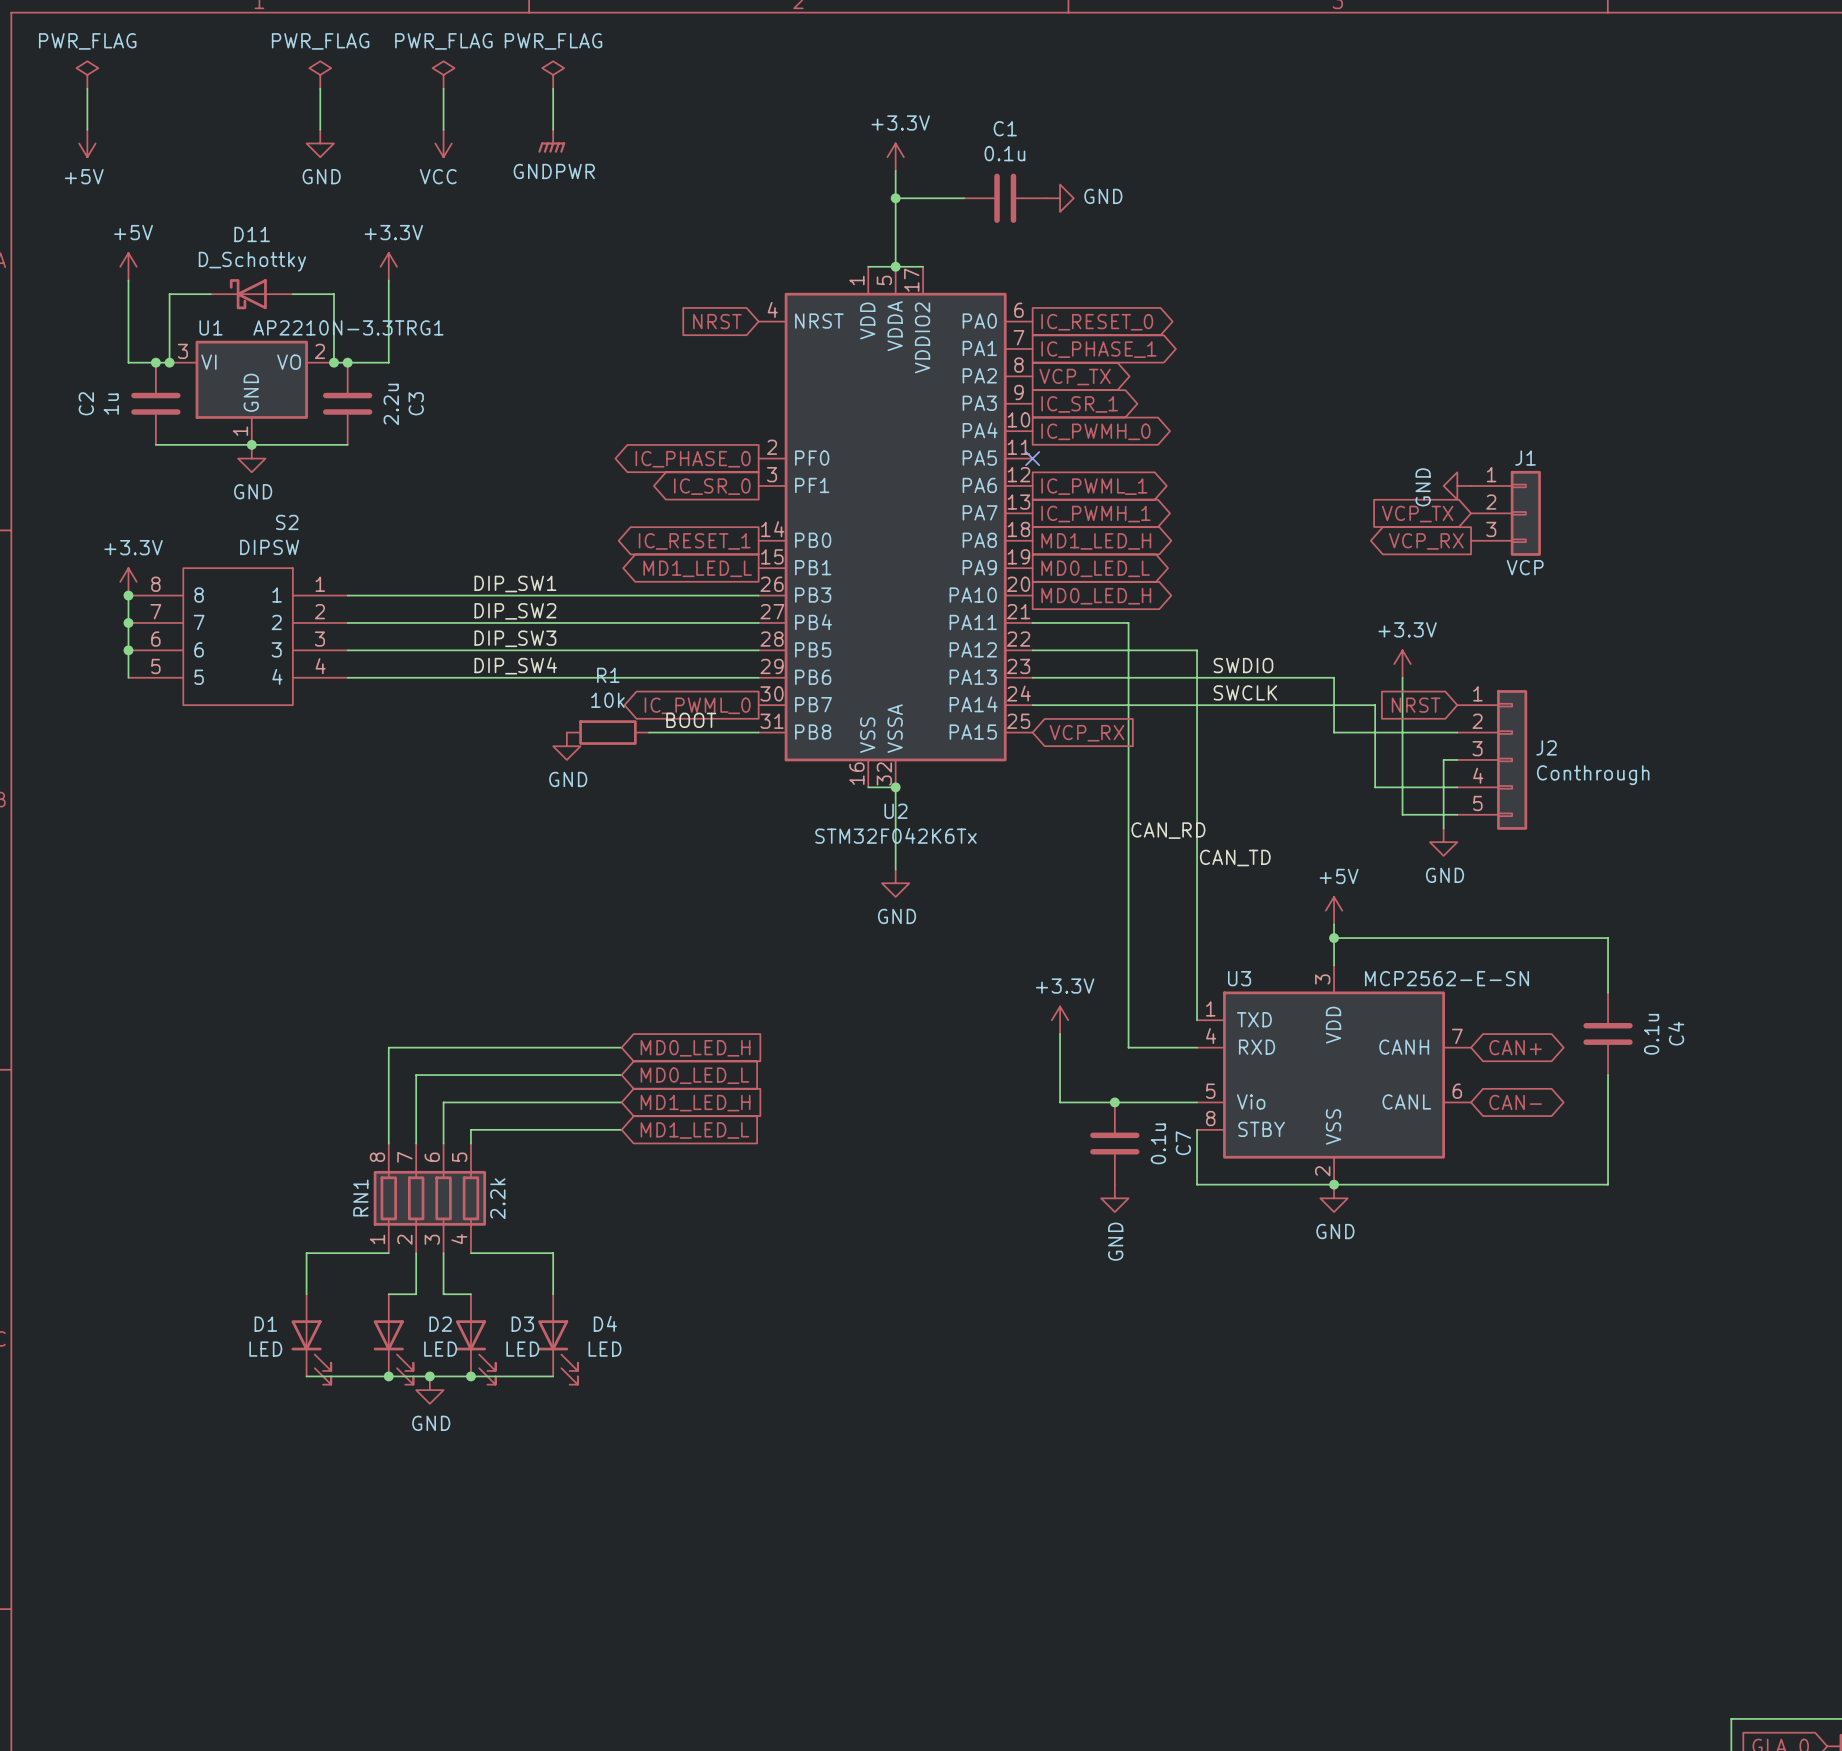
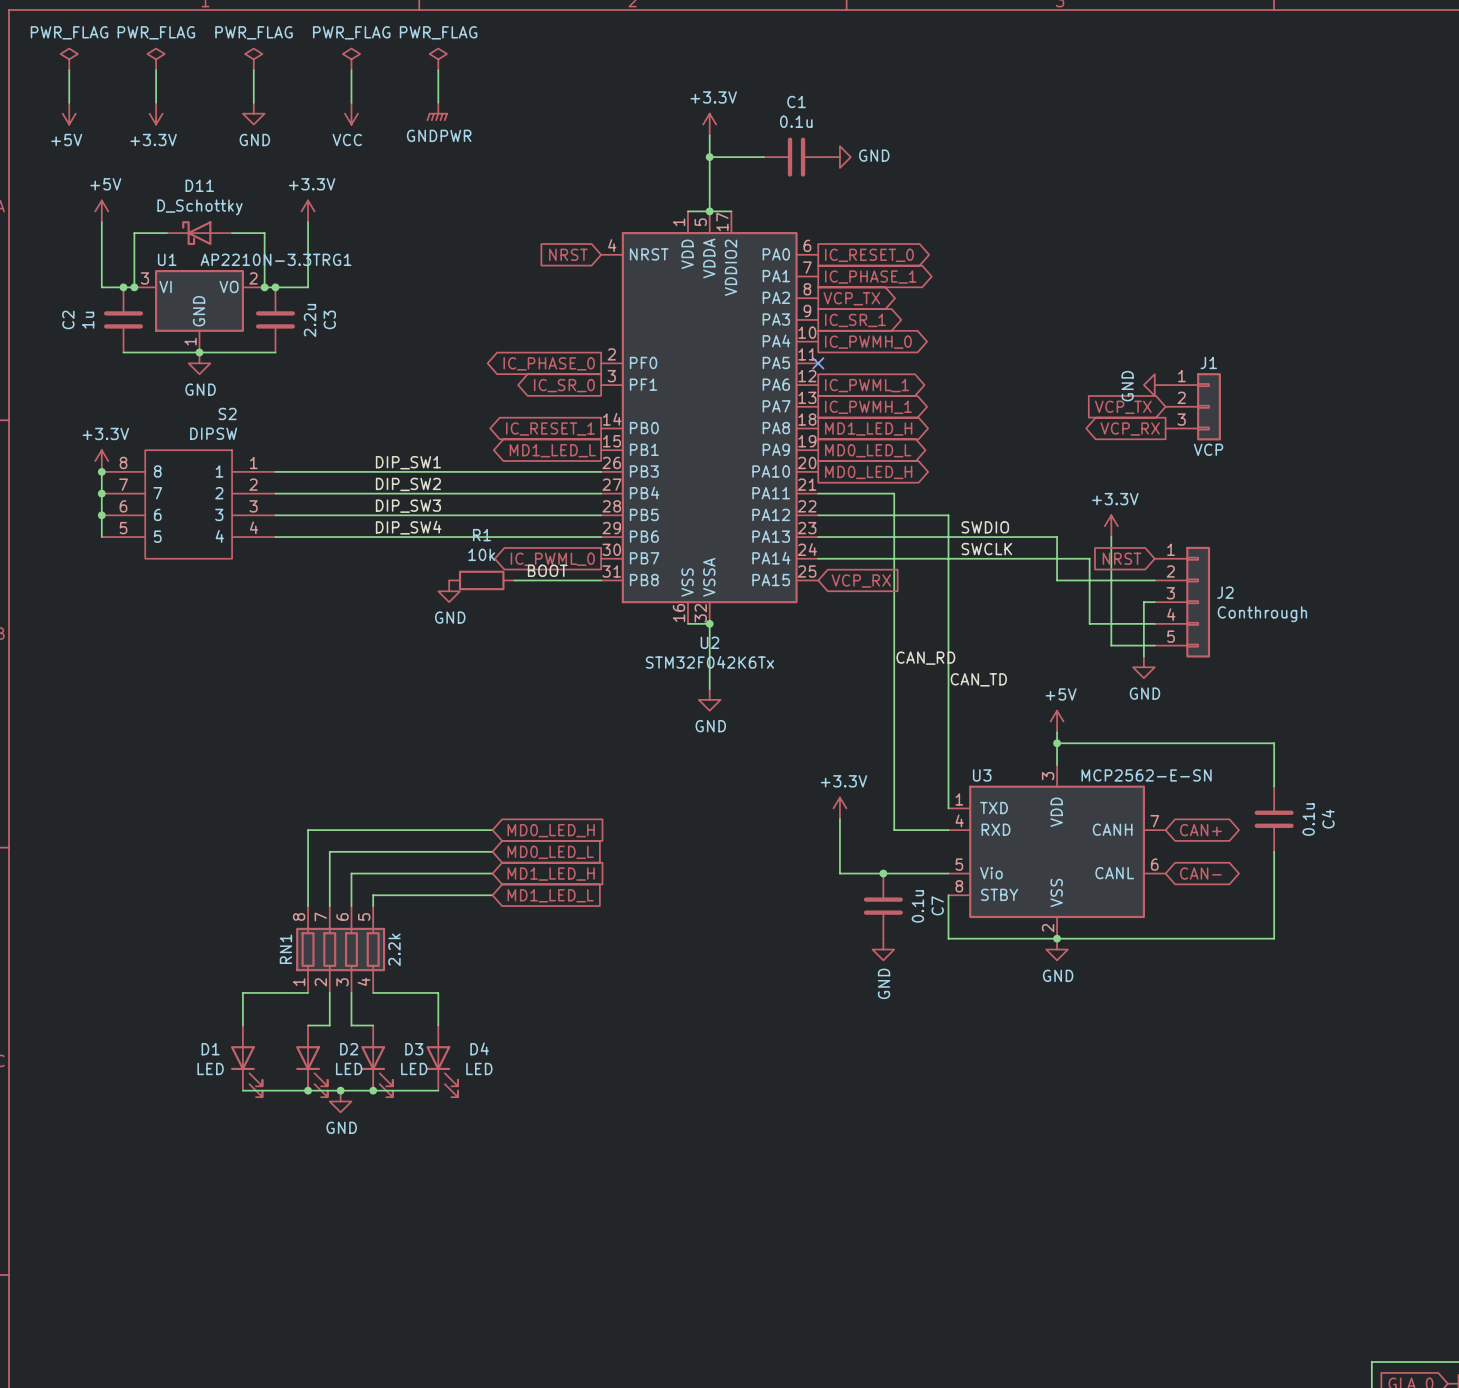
power symbol: none -> PWR_FLAG (156, 59)
wire: none -> (156, 70) (156, 102)
power symbol: none -> +3.3V (156, 113)

